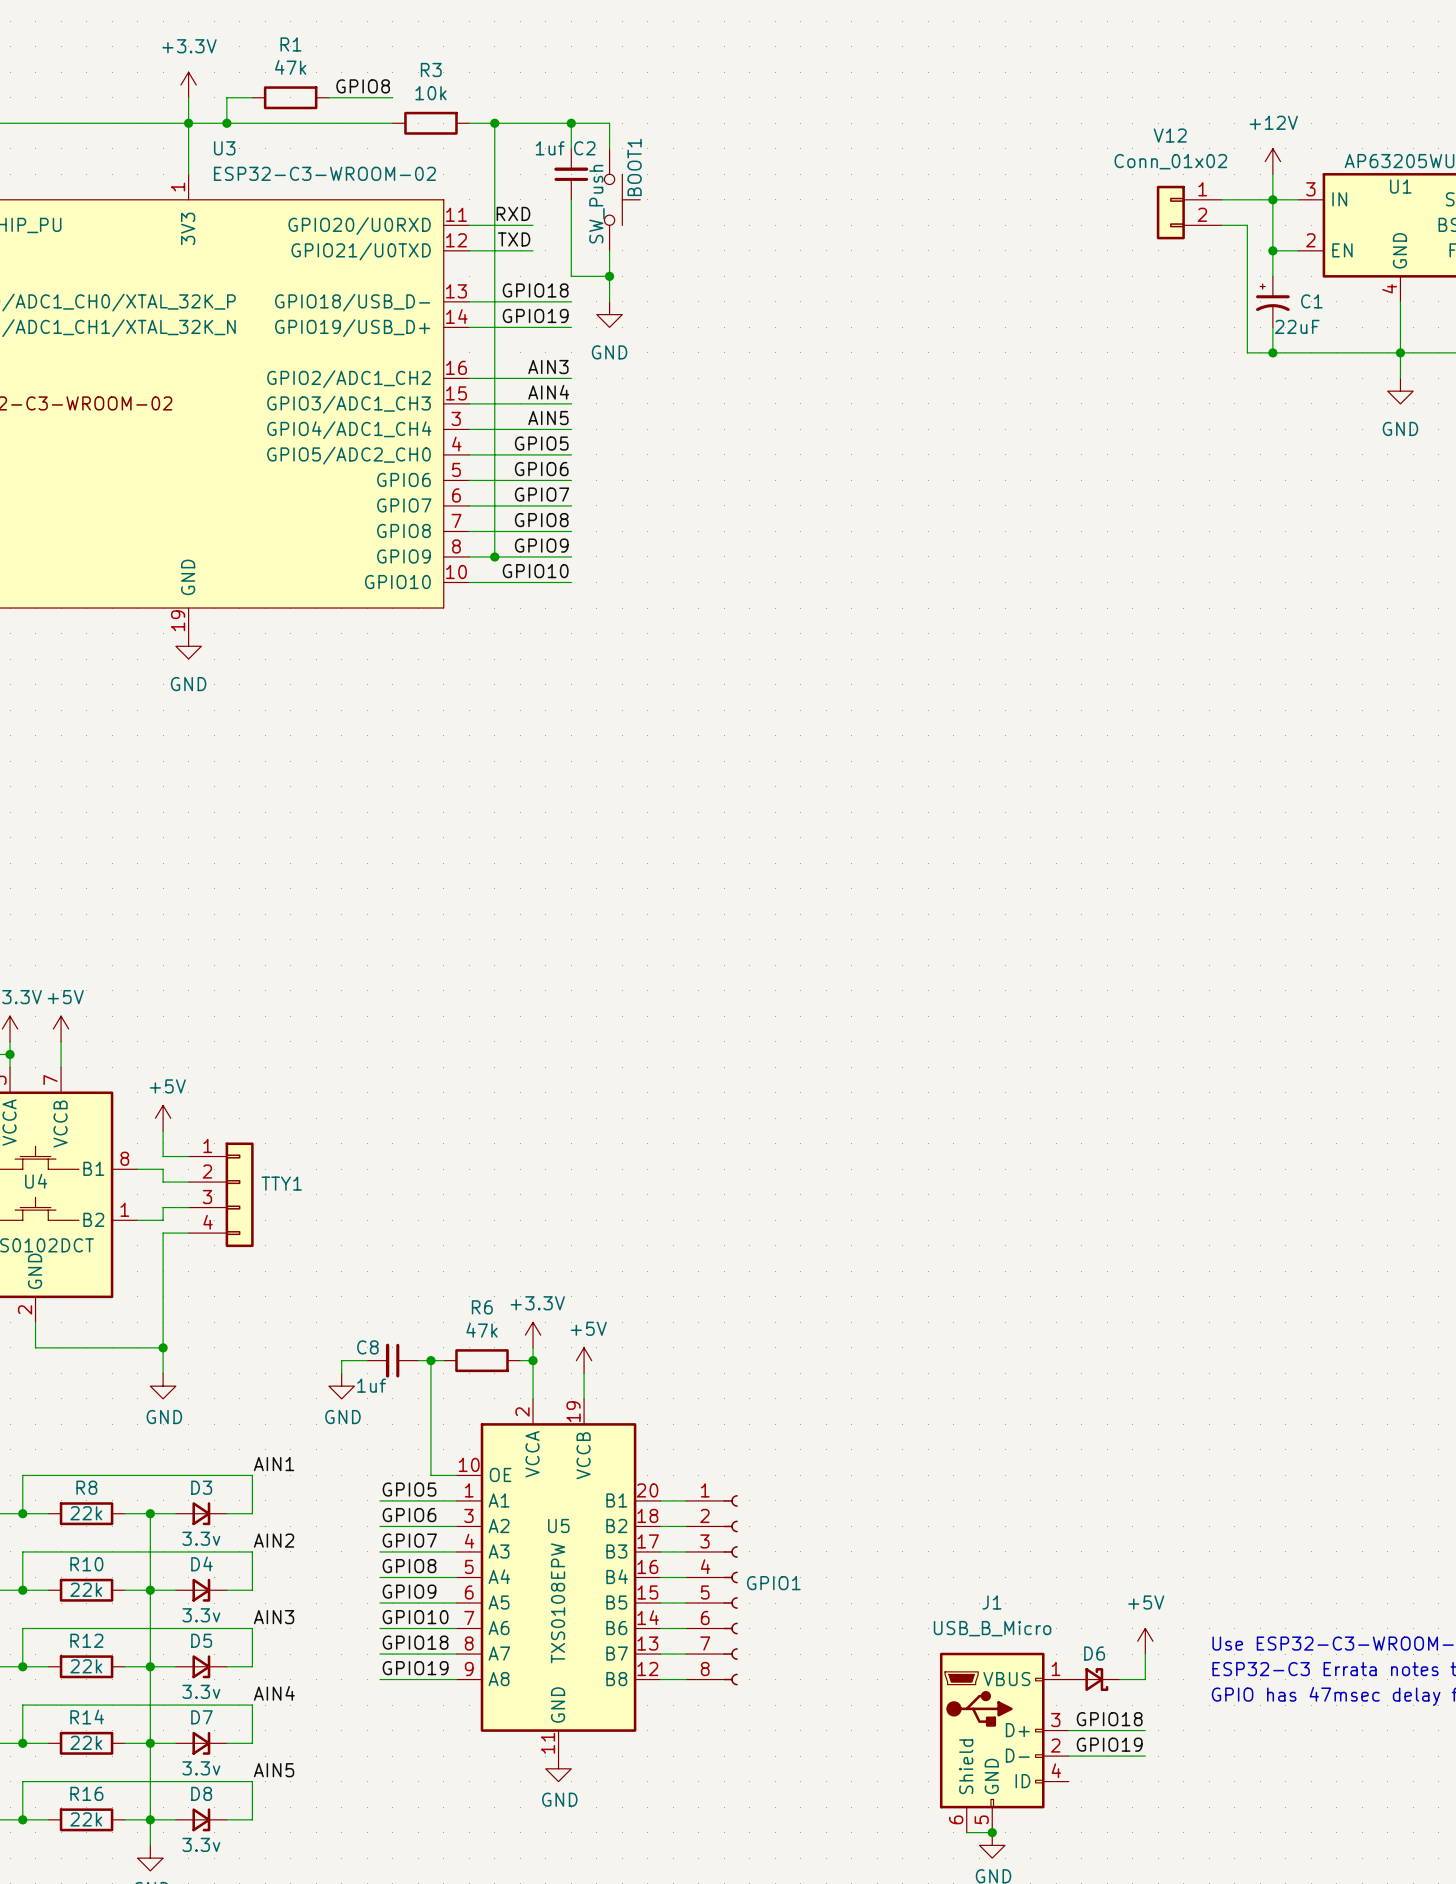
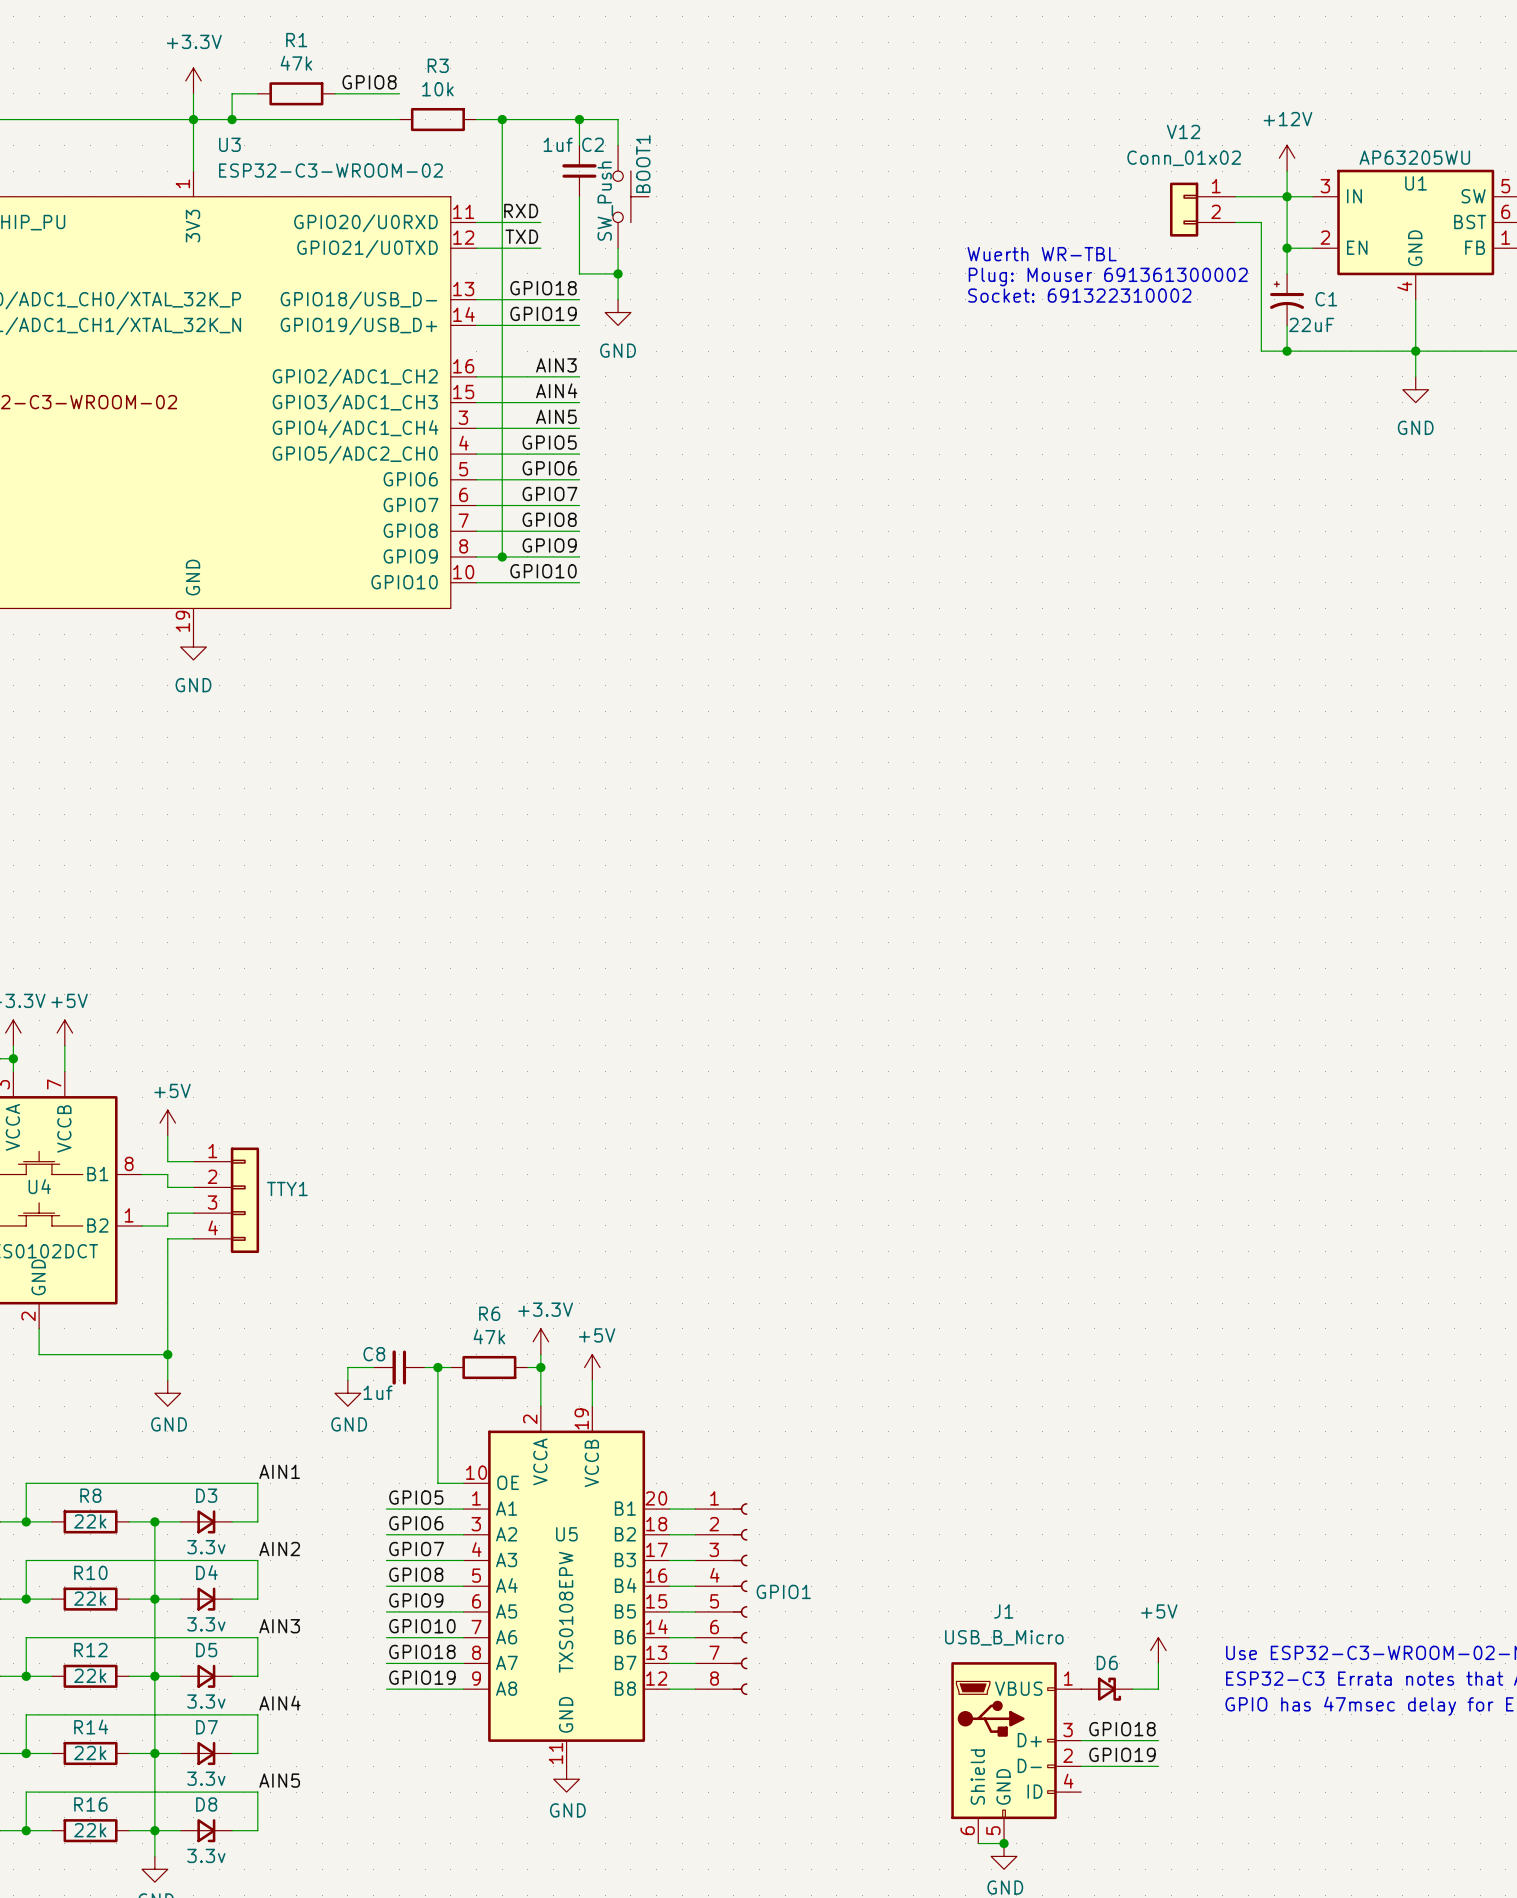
text: none -> Wuerth WR-TBL (1042, 254)
text: none -> Plug: Mouser 691361300002 (1108, 277)
text: none -> Socket: 691322310002 (1079, 295)

